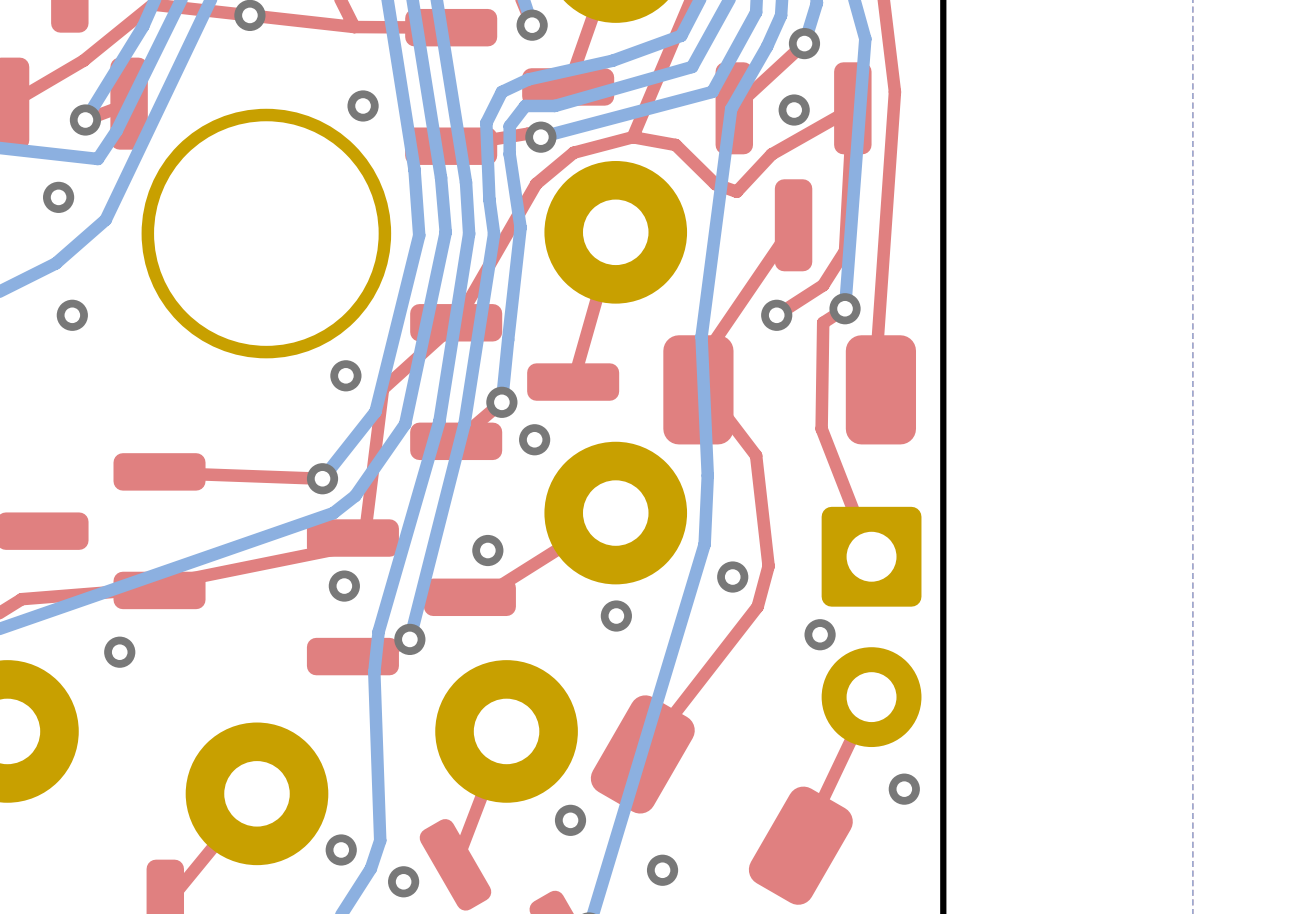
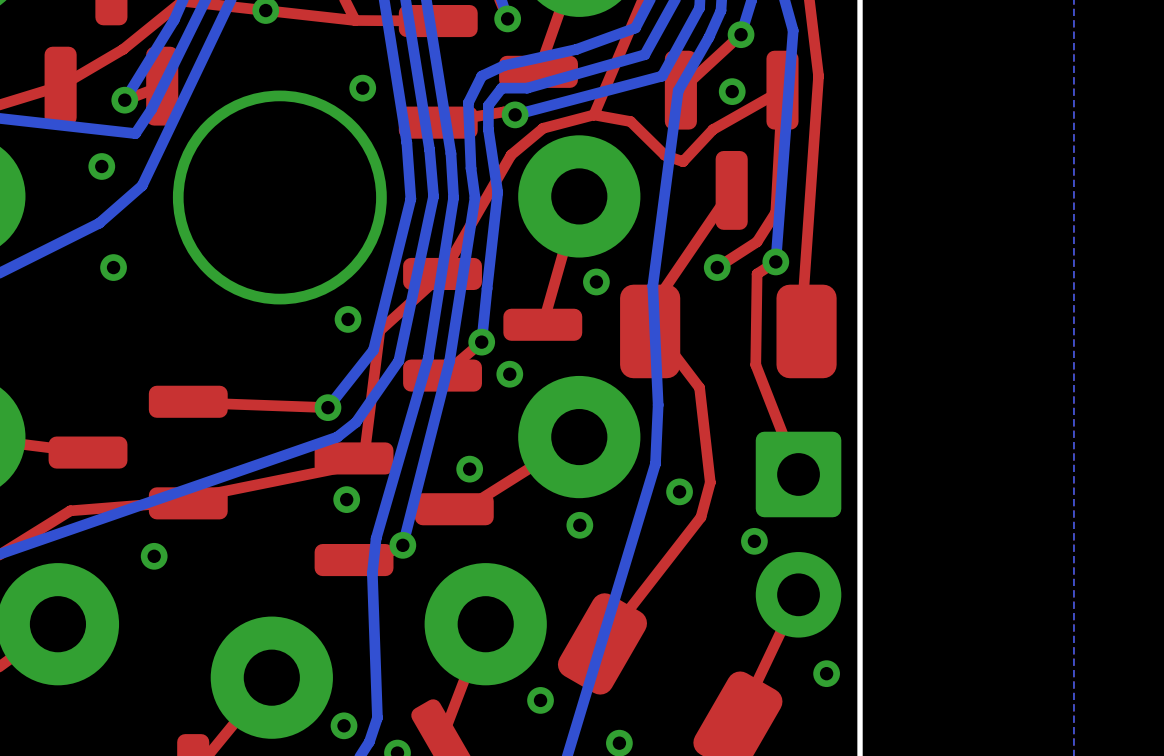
via: none -> (596, 281)

